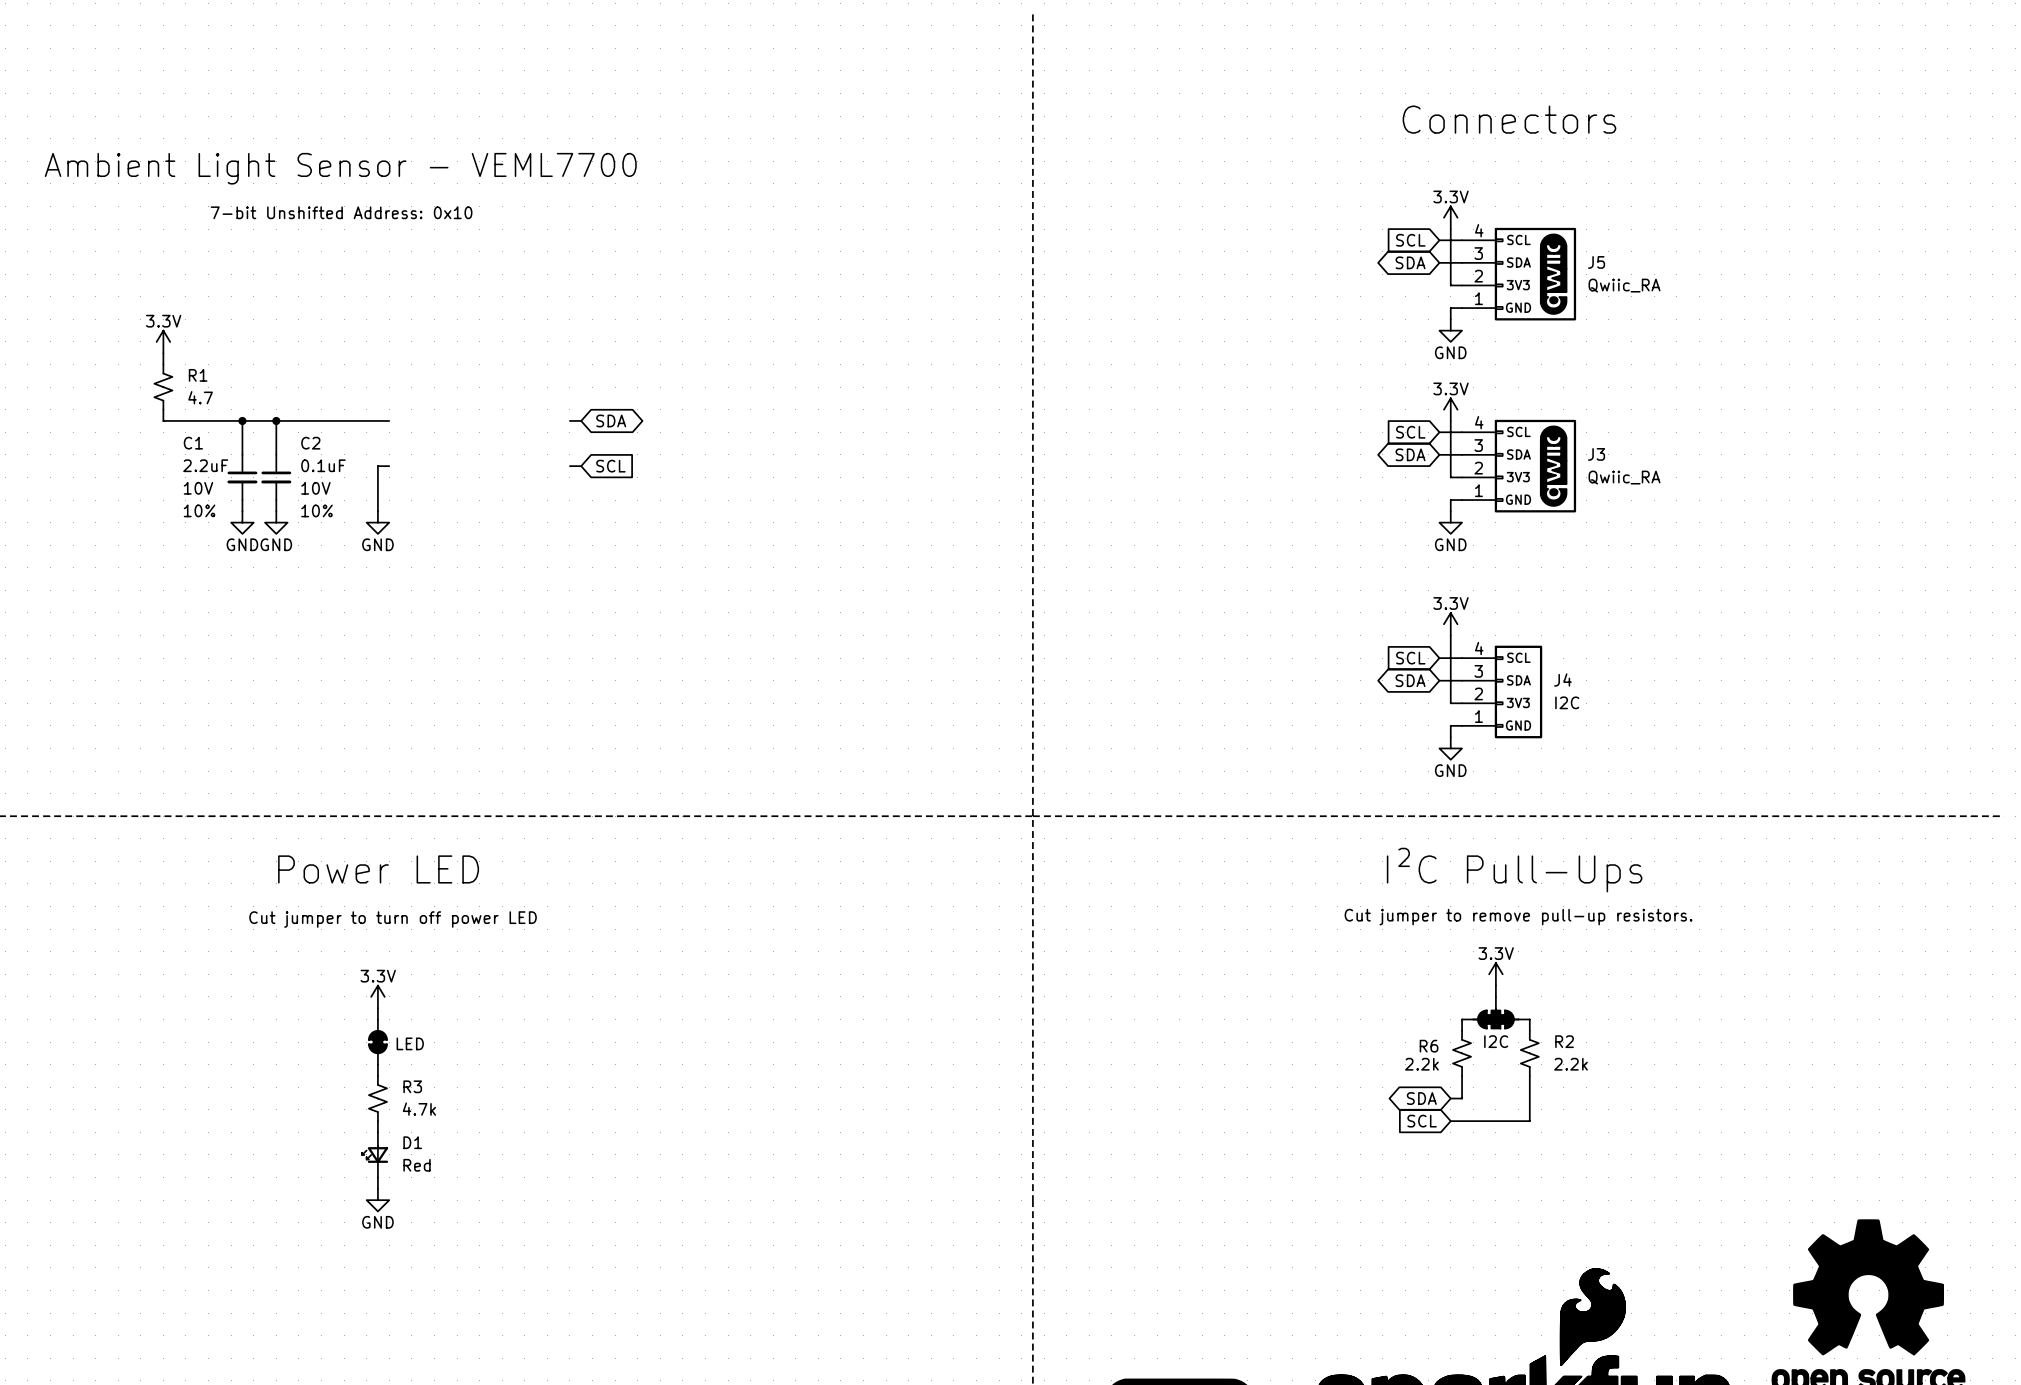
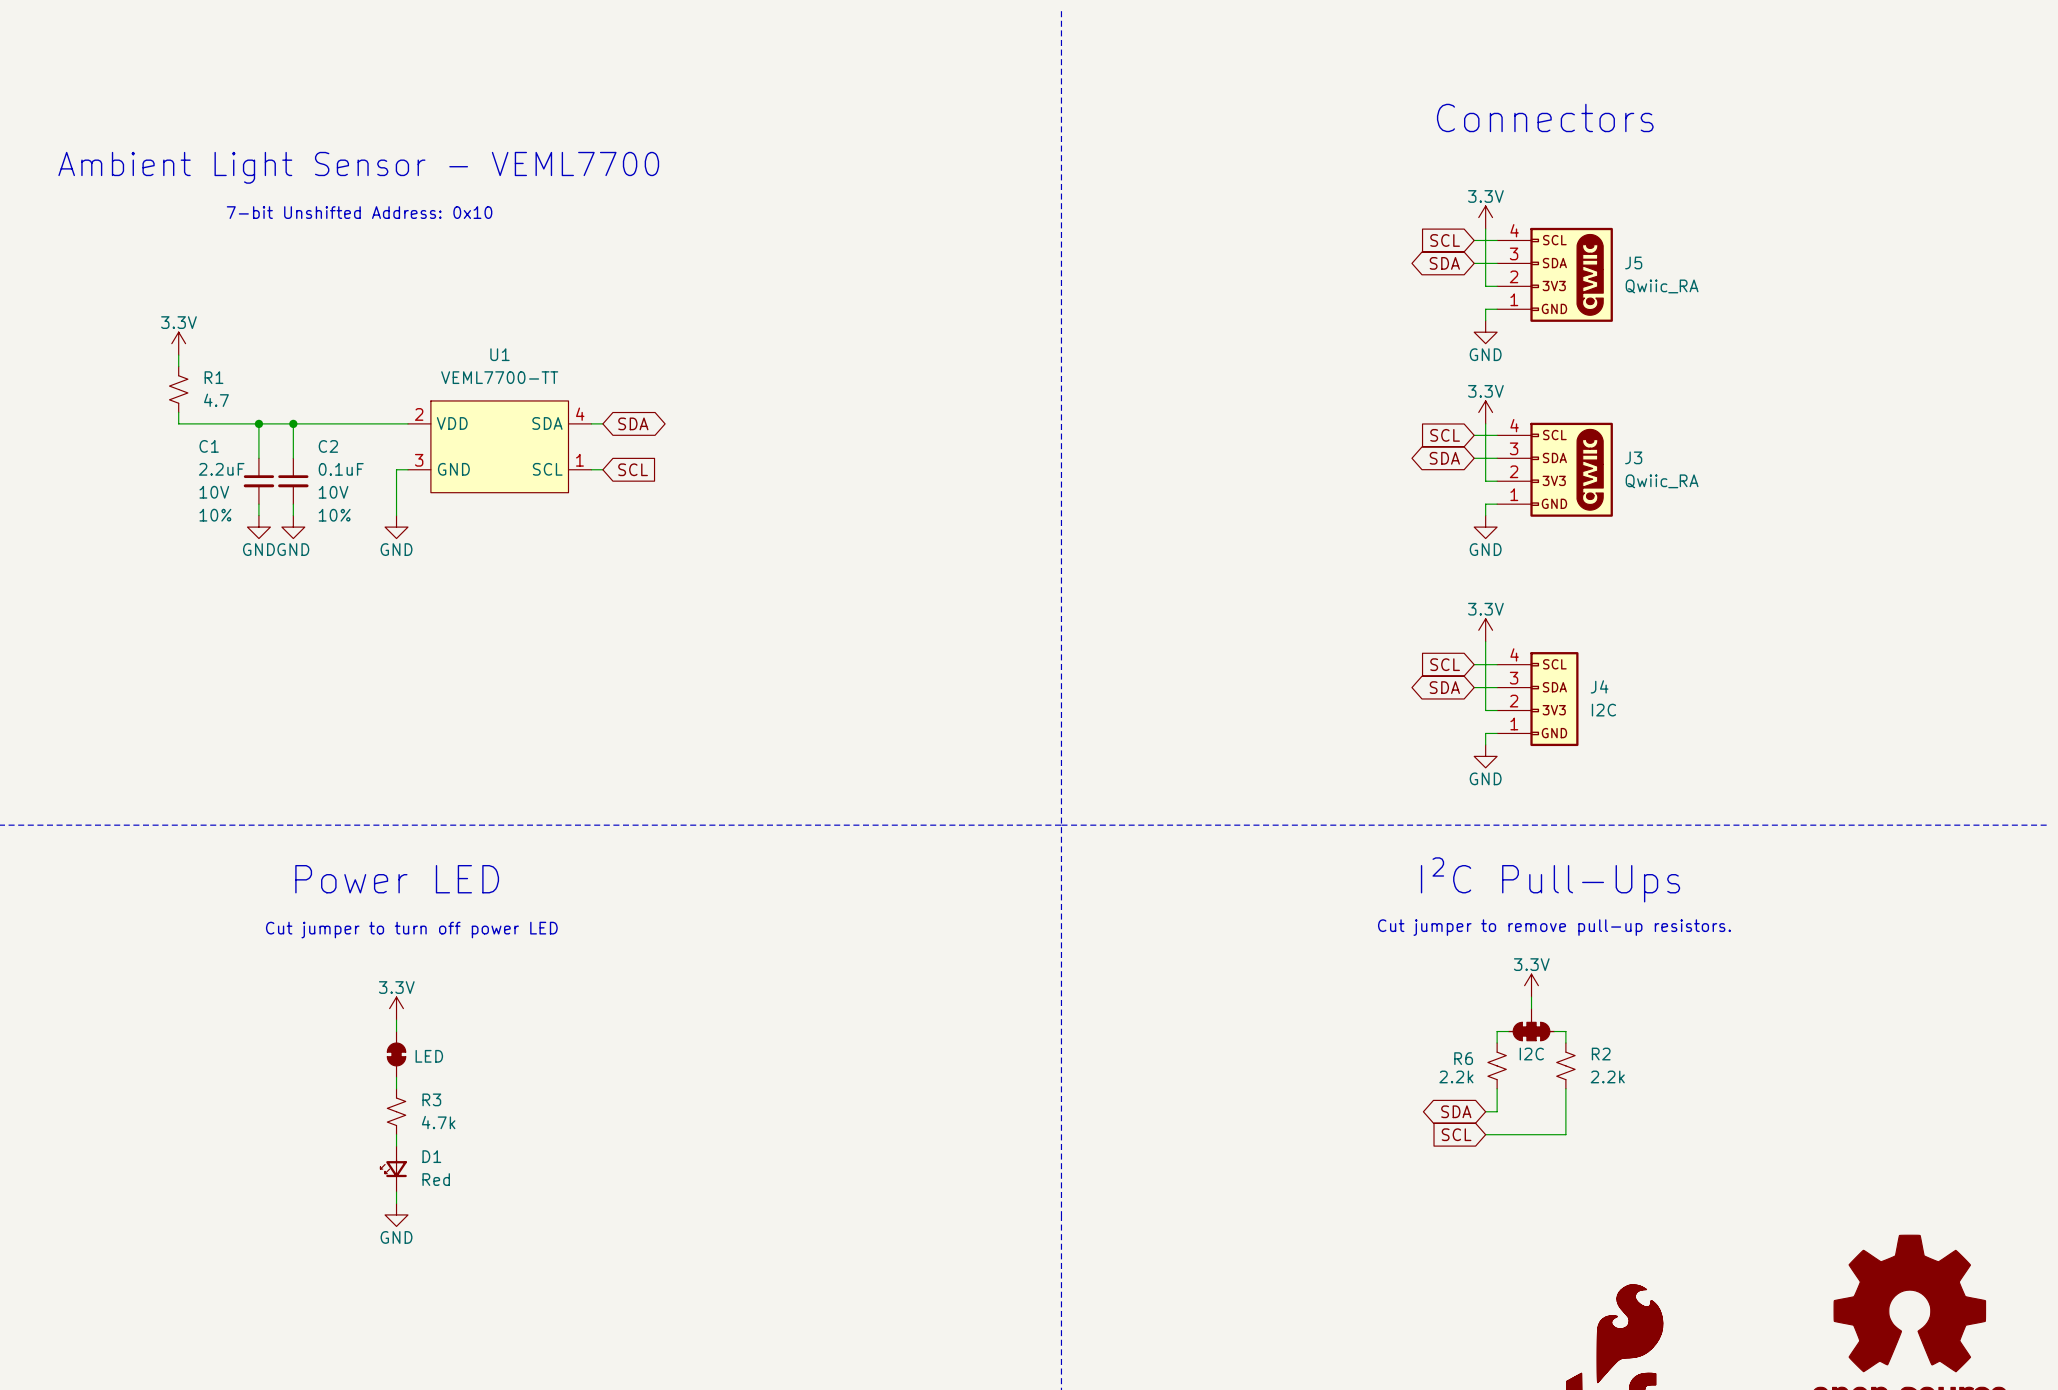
U1: none -> VEML7700-TT (499, 446)

